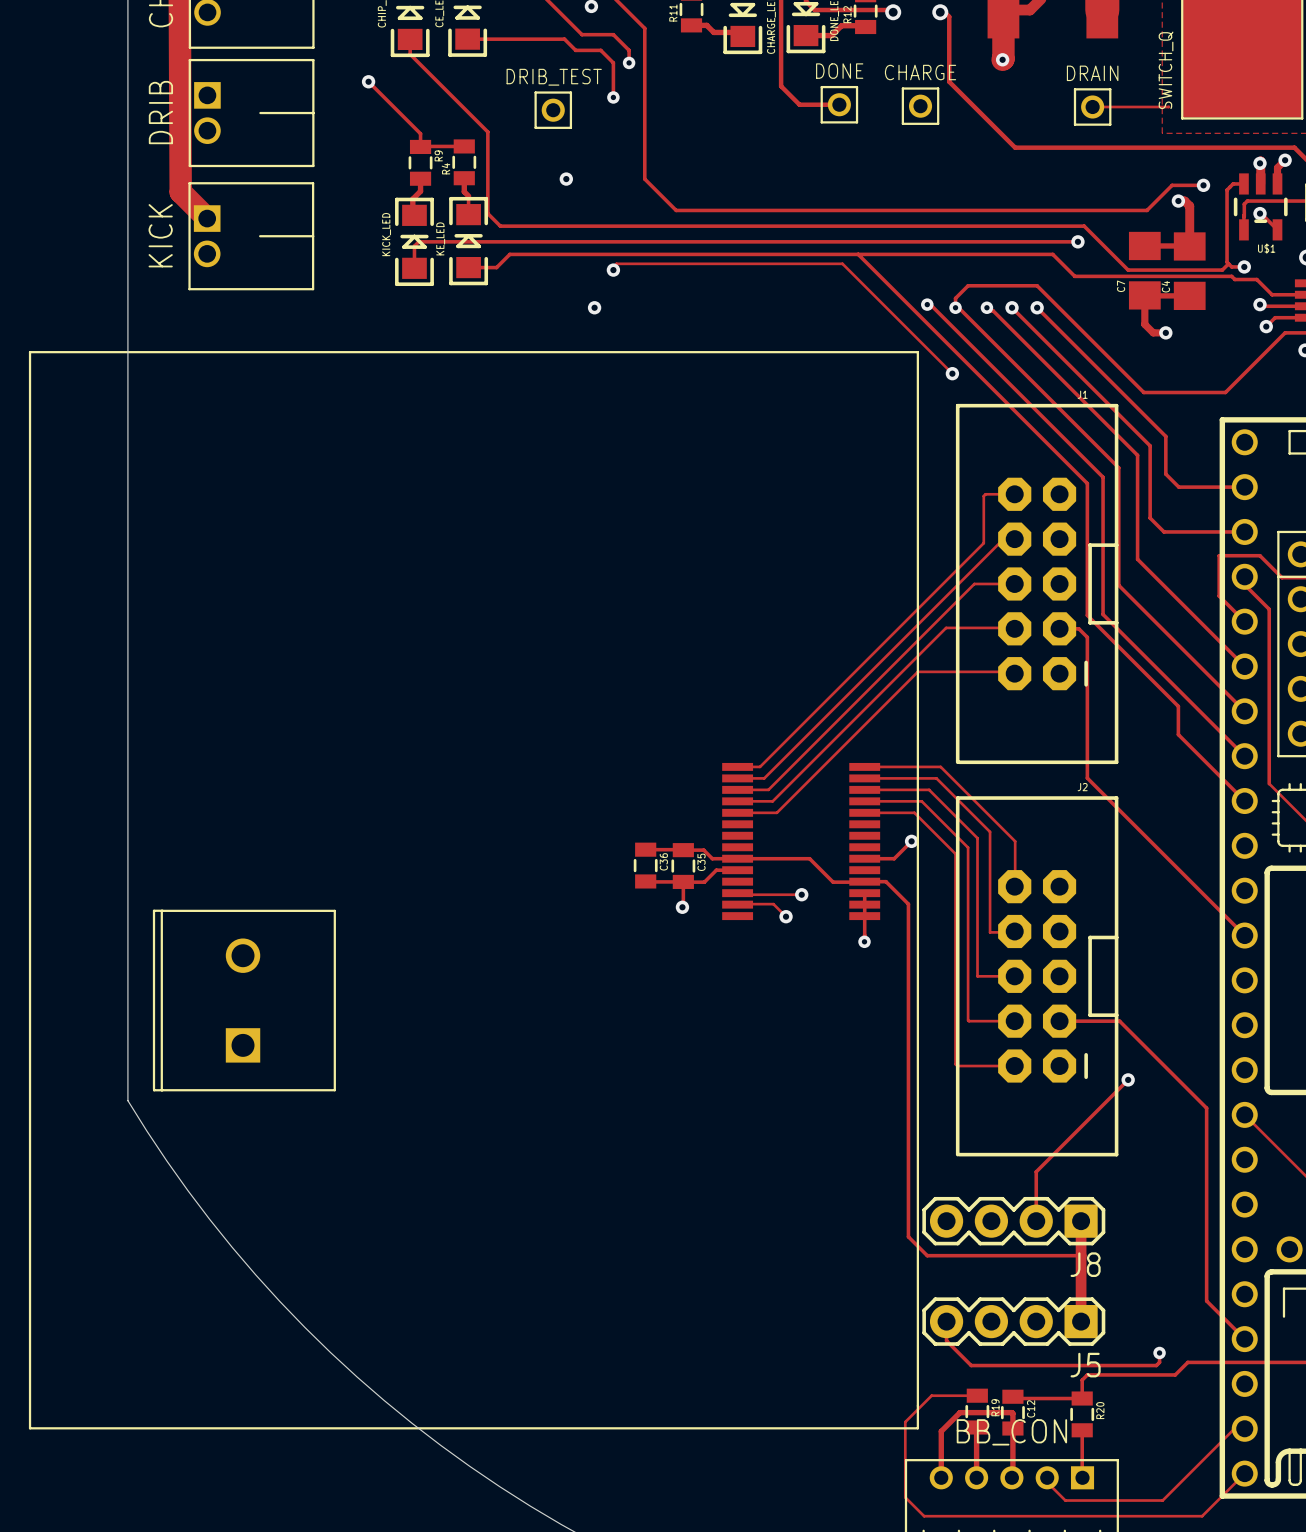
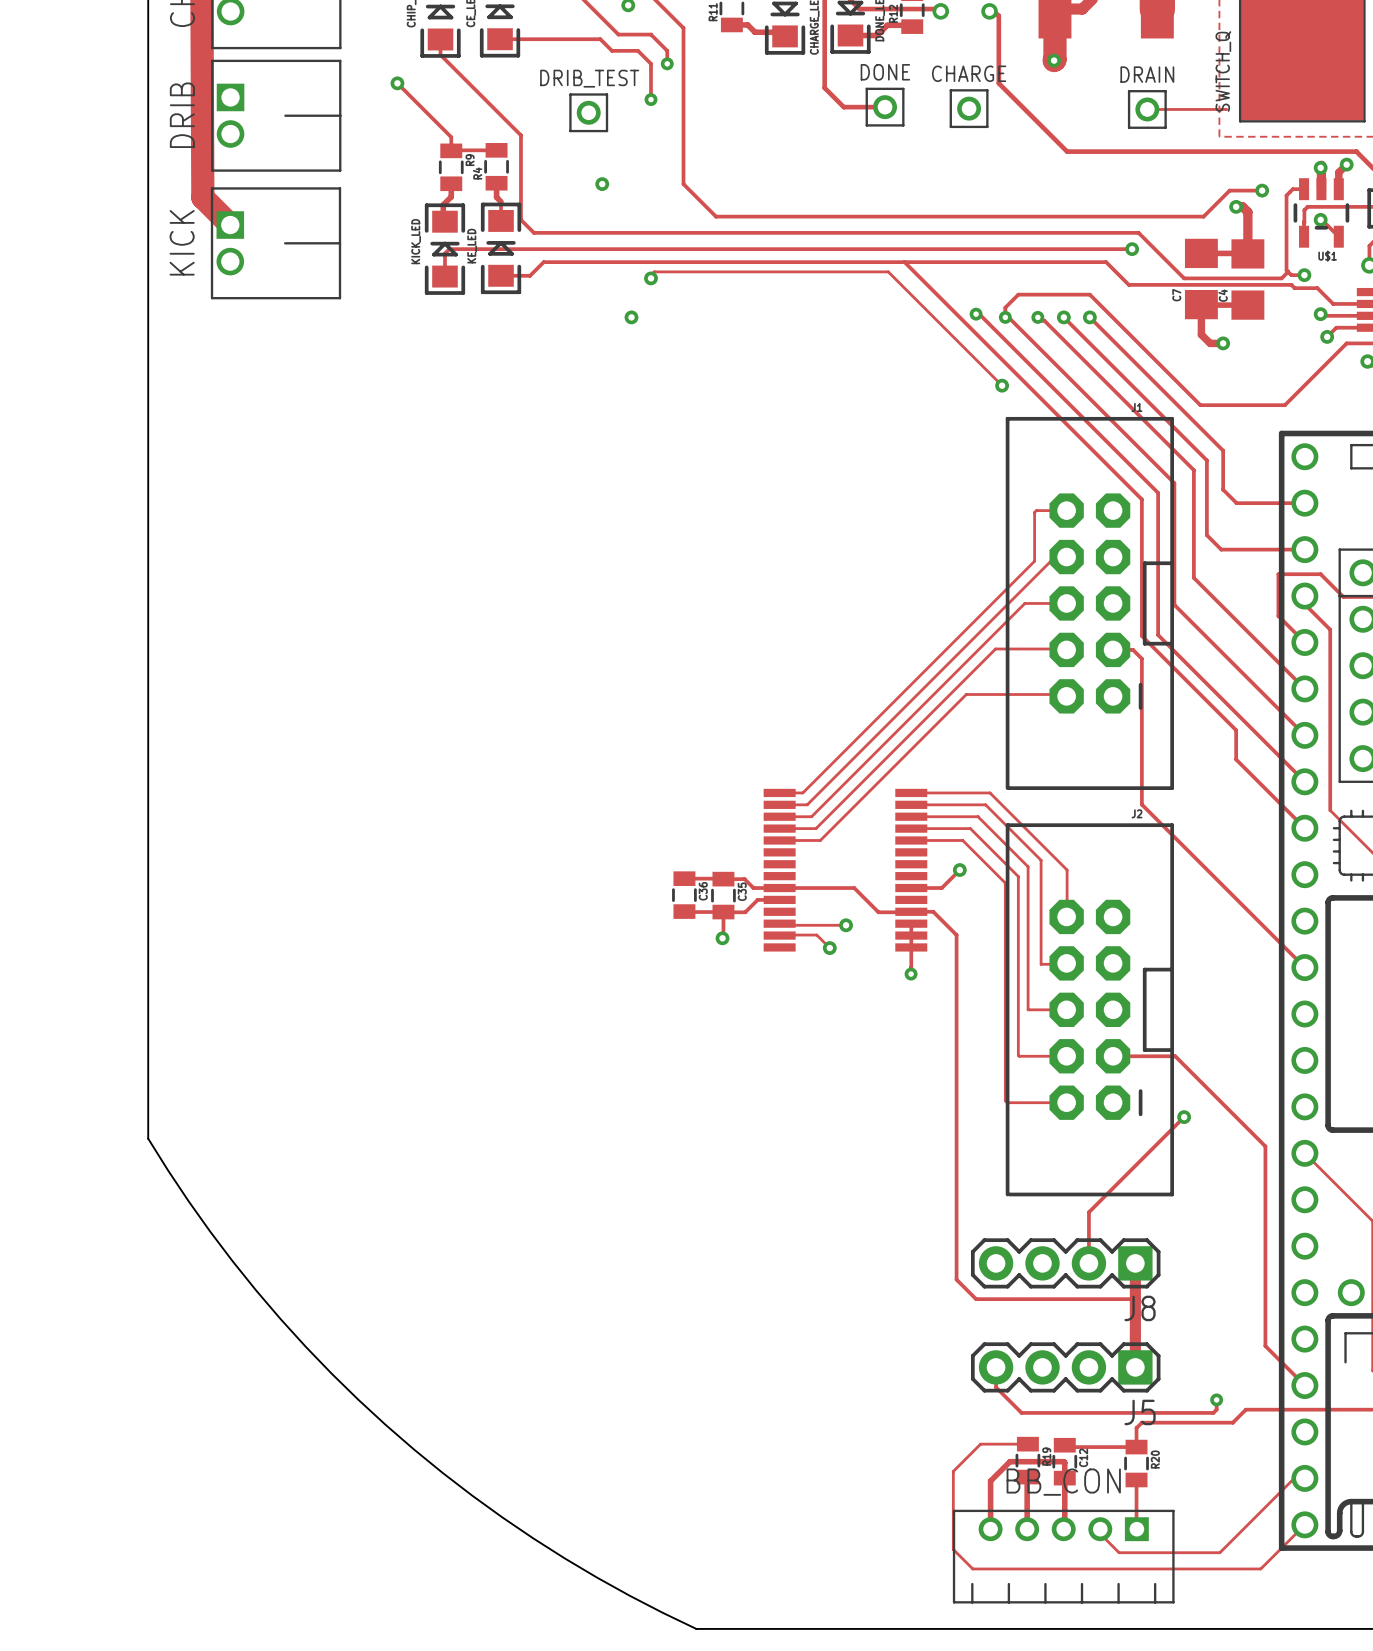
drawing: [28, 351, 919, 1430] -> none
part: (244, 1000) -> none

